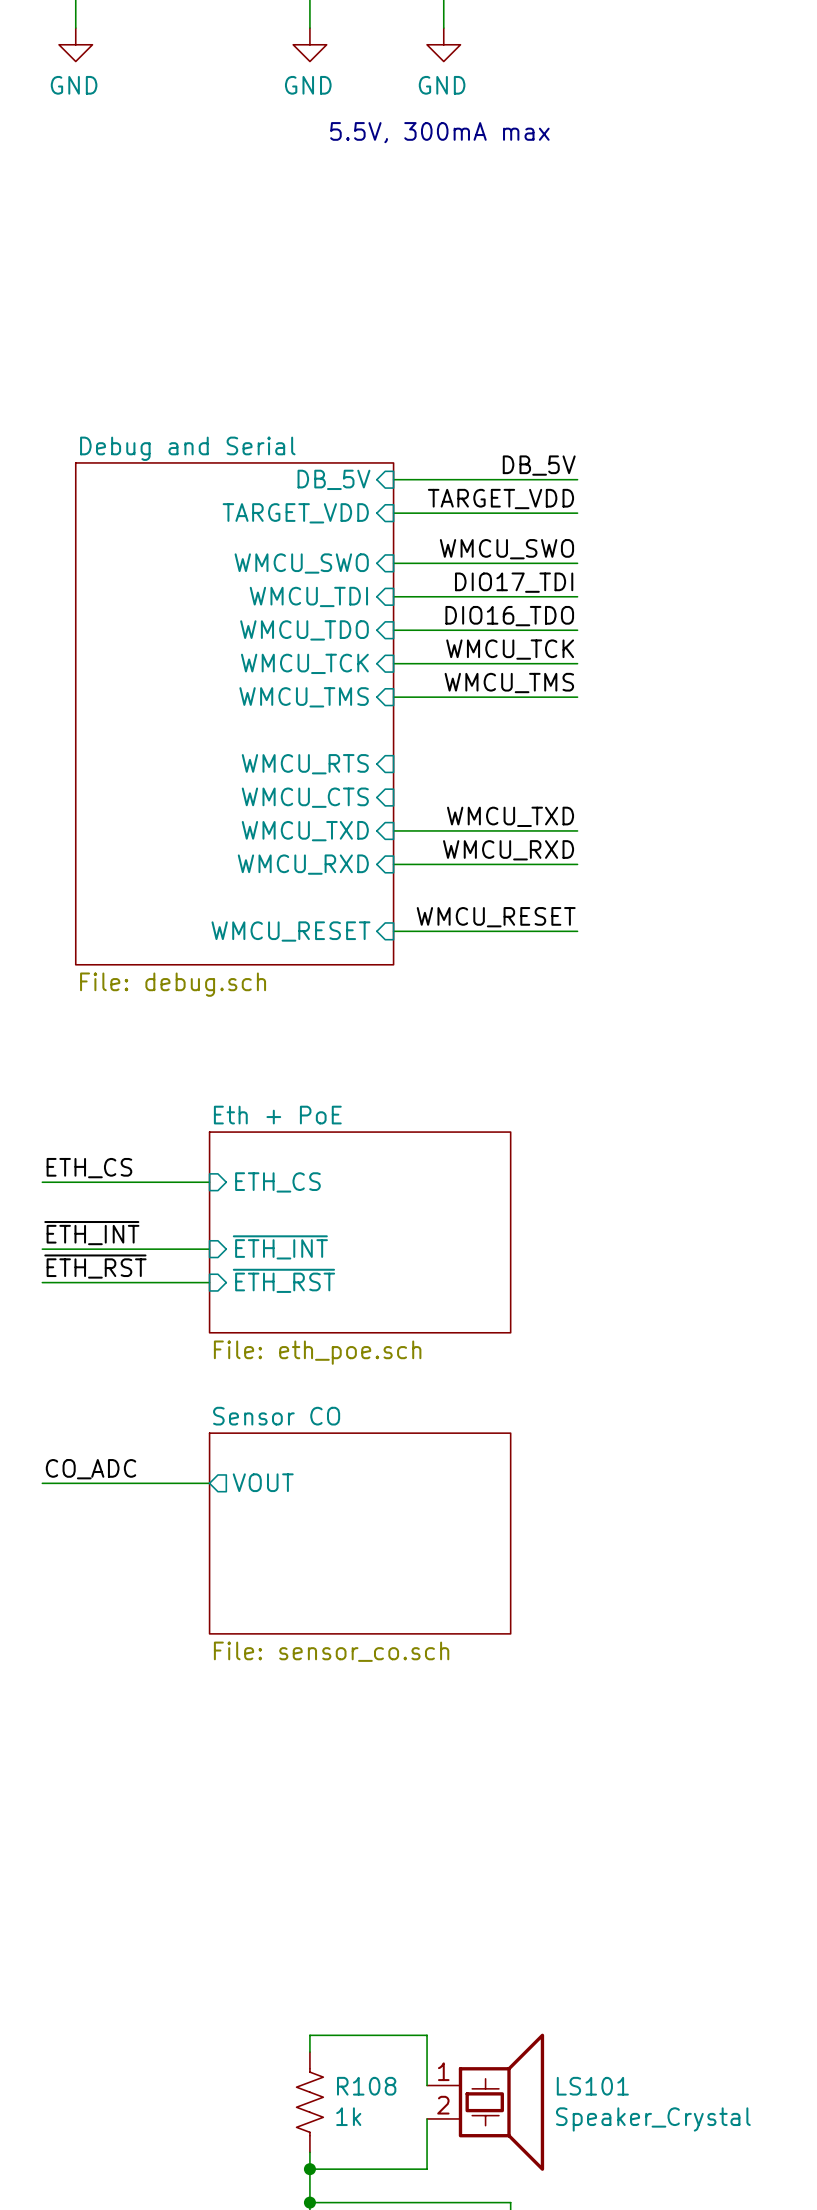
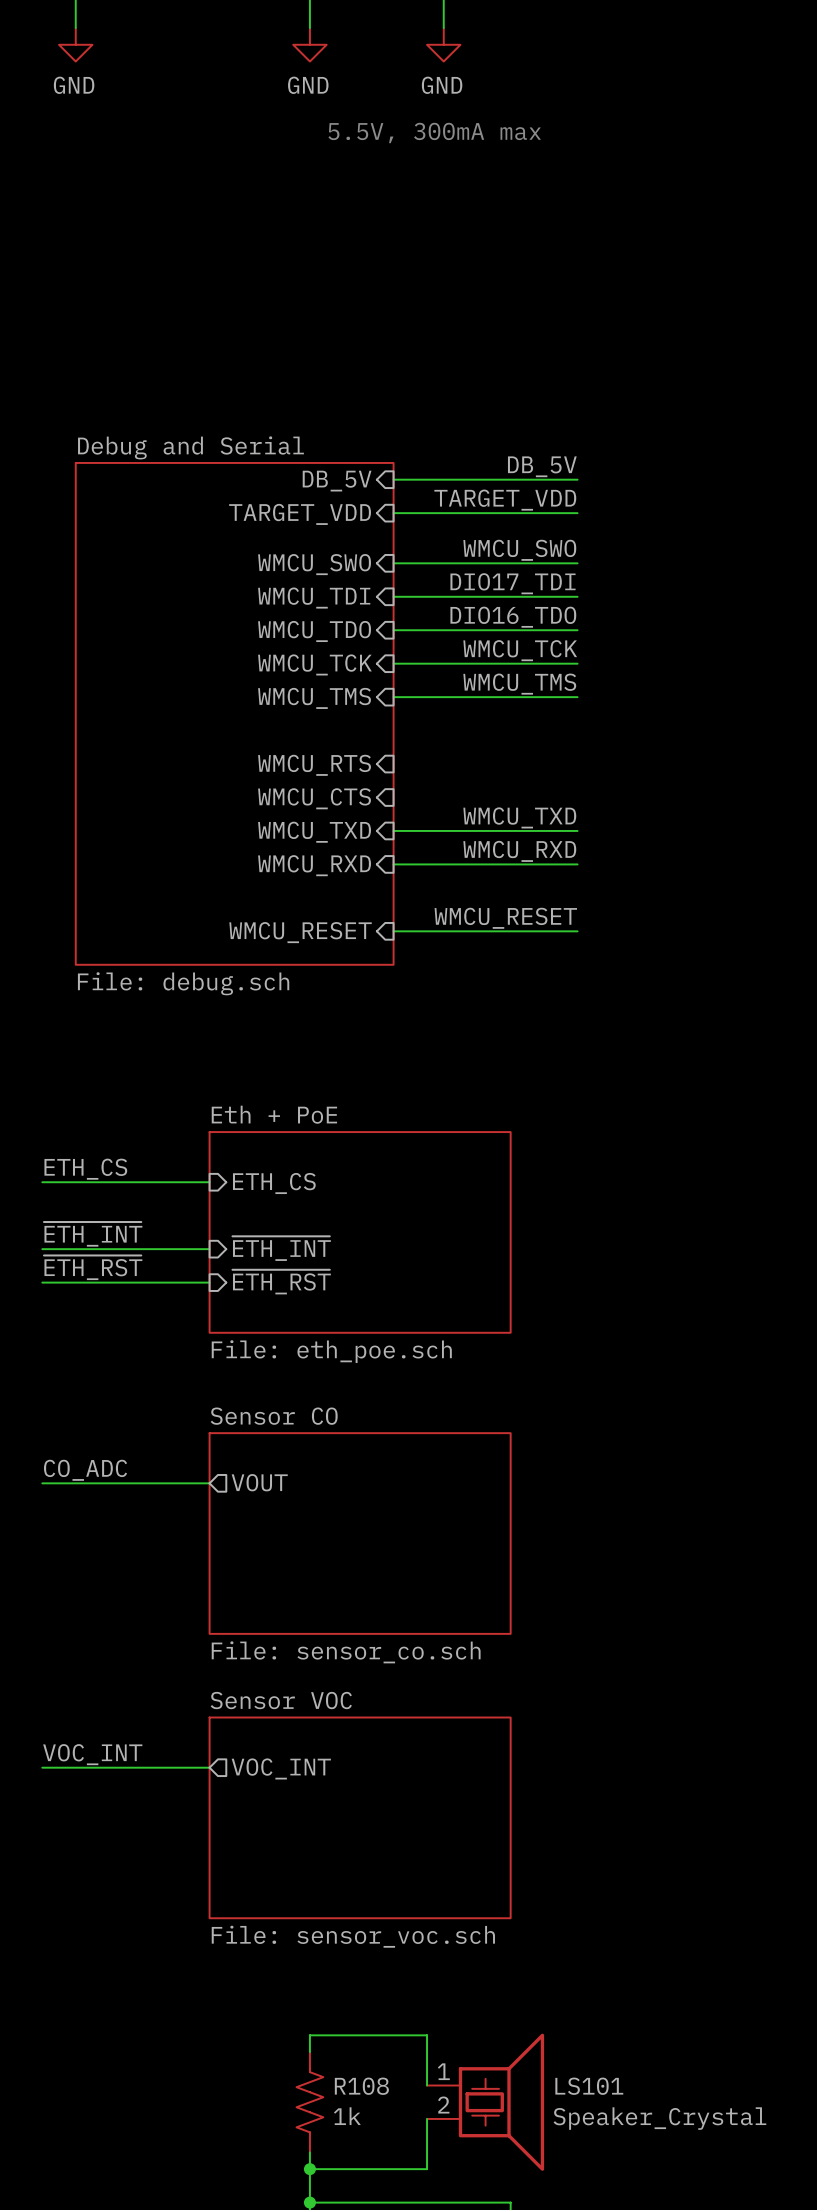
label: none -> VOC_INT (92, 1754)
wire: none -> (42, 1767) (209, 1767)
sheet pin: none -> VOC_INT (281, 1768)
sheet Sensor VOC: none -> File: sensor_voc.sch (360, 1817)

